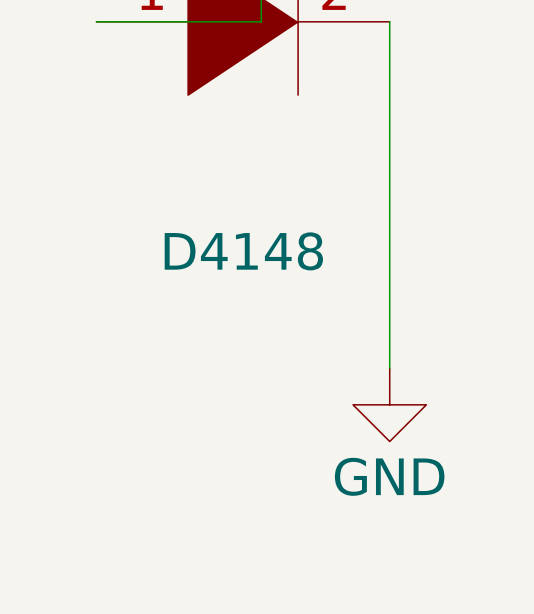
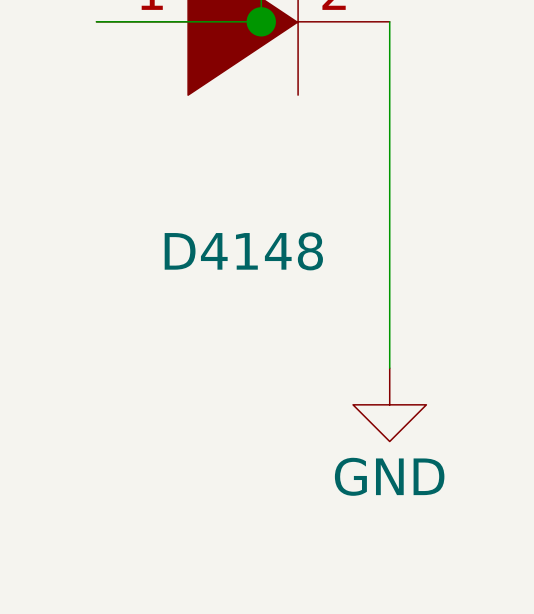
junction: none -> (261, 21)

